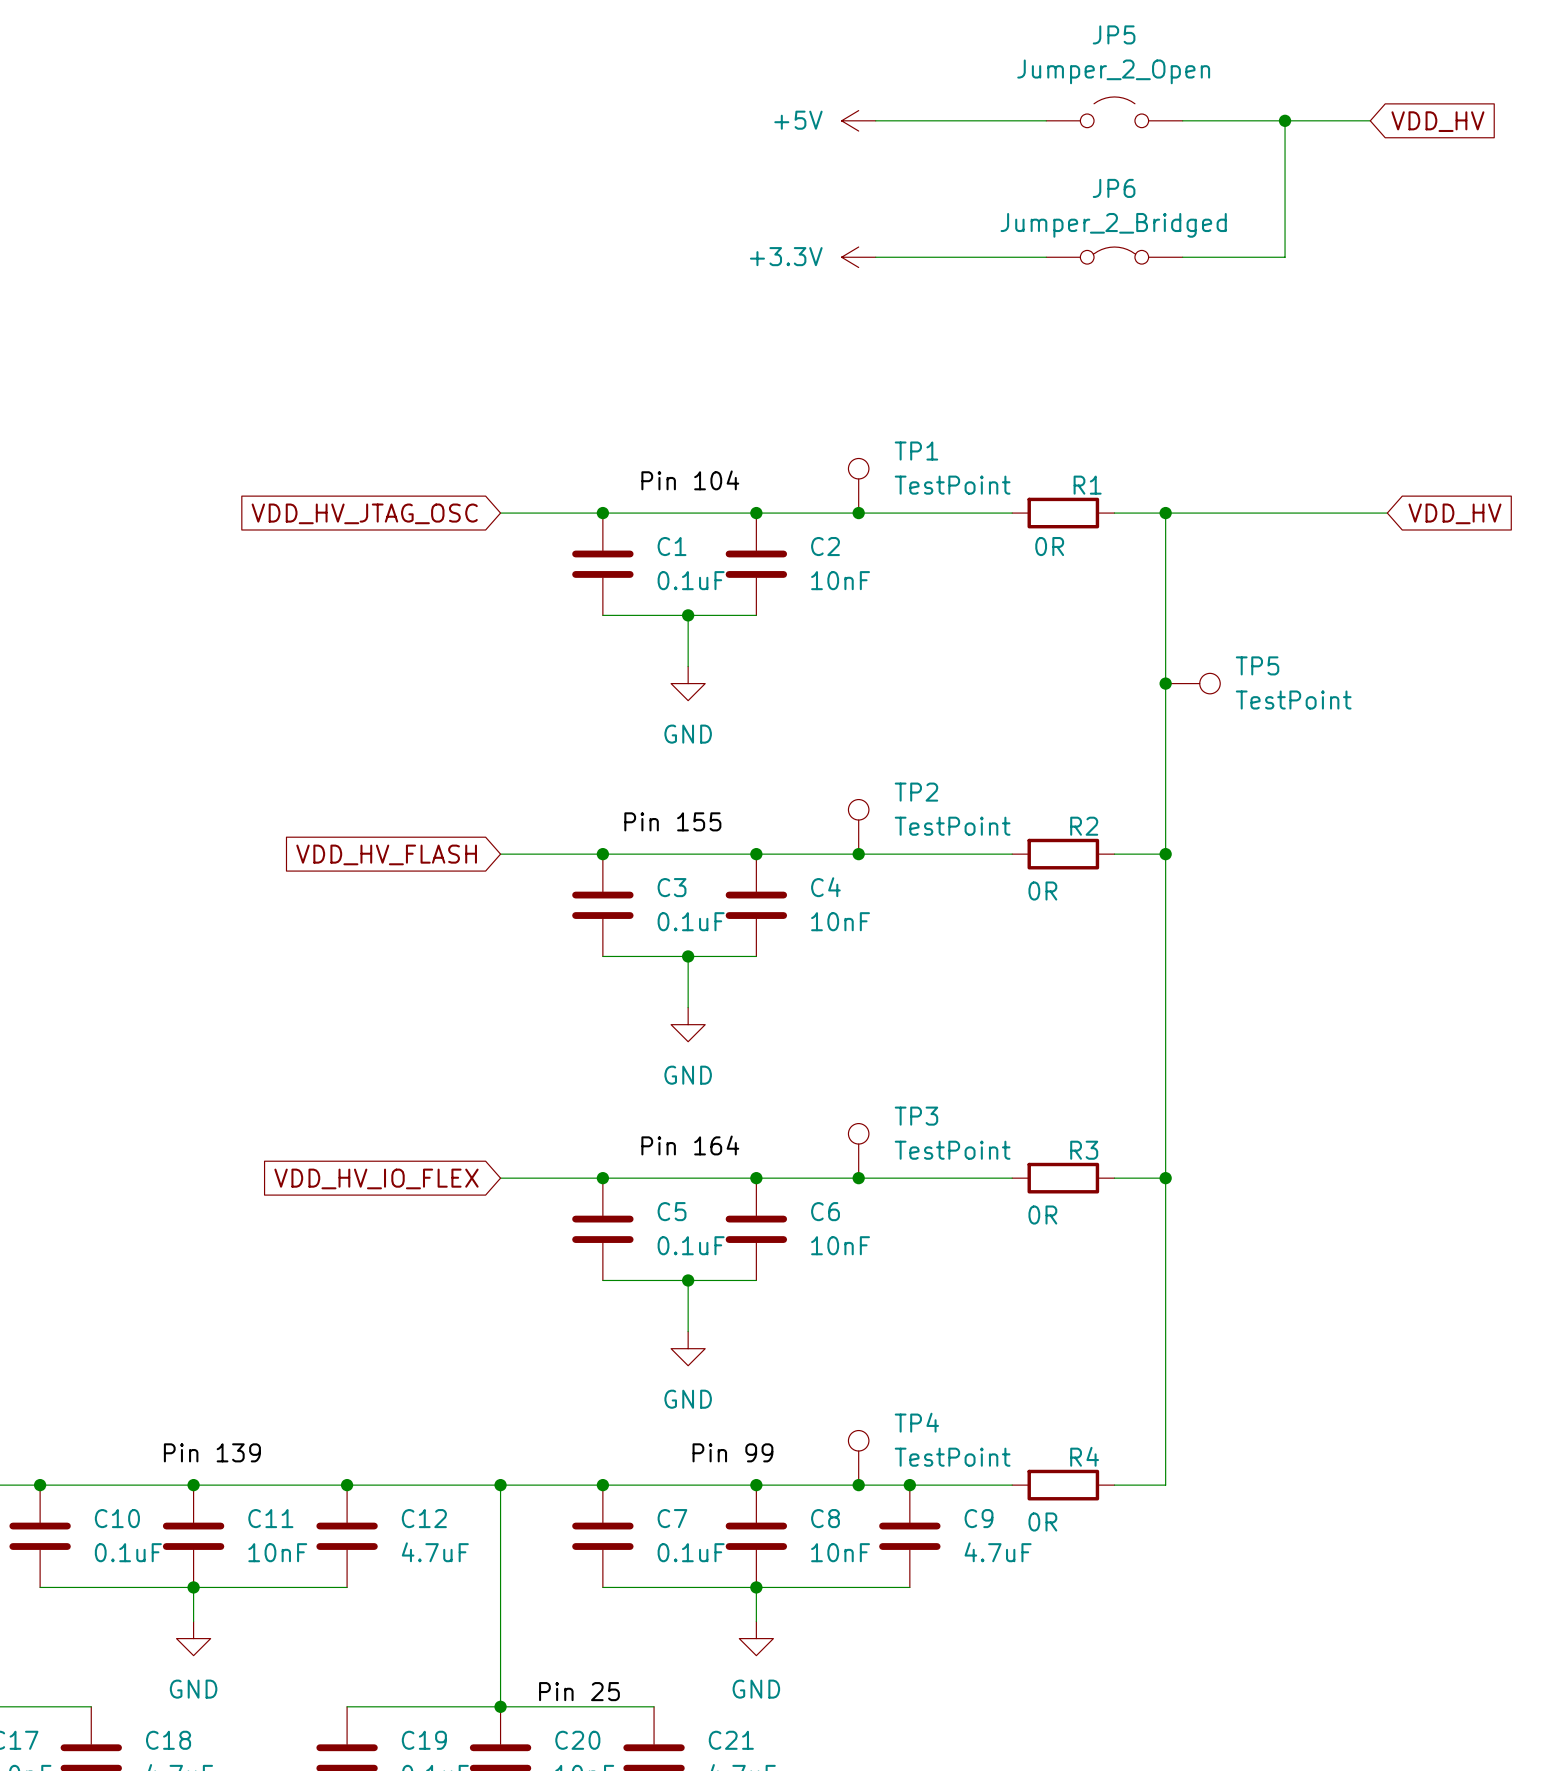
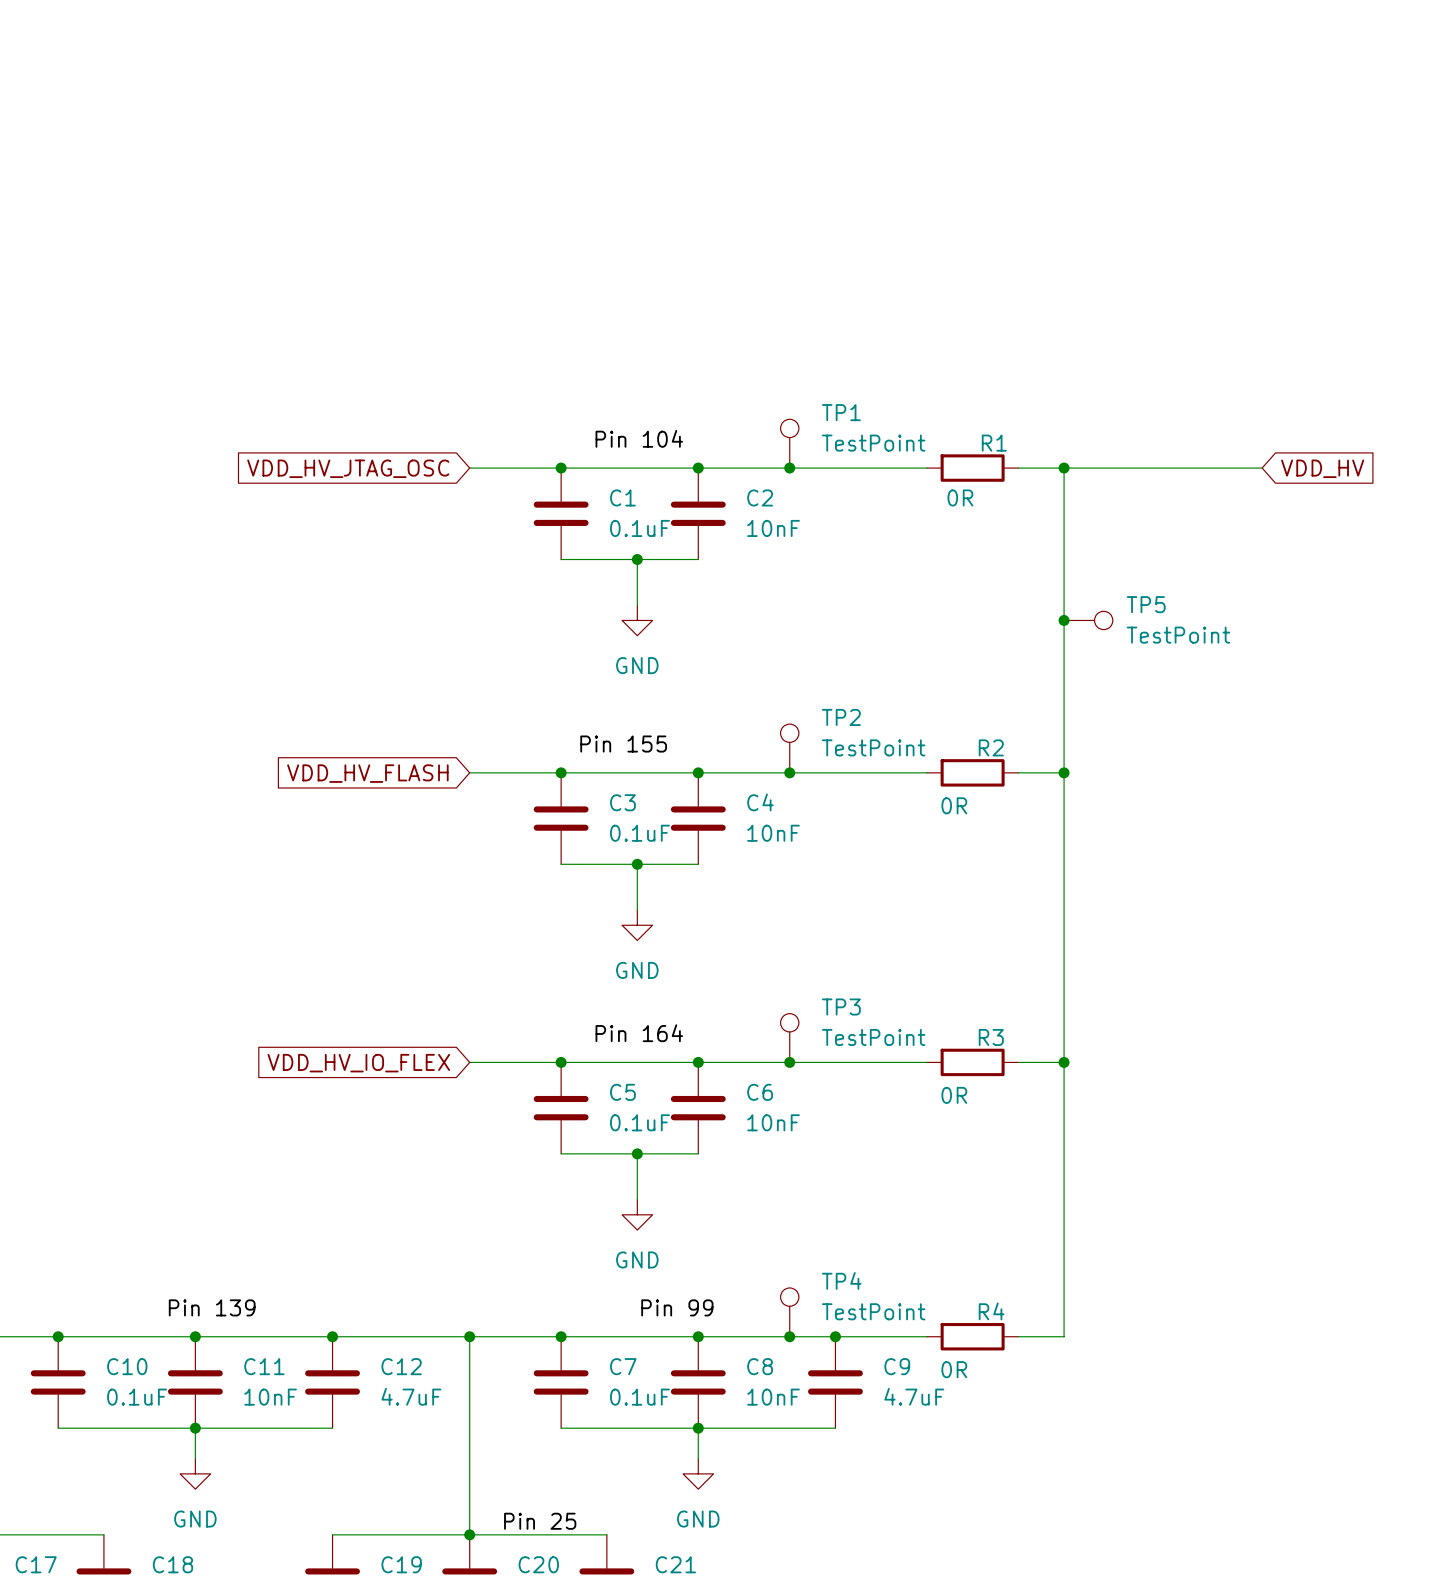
JP5: Jumper_2_Open (1114, 112) -> none
power symbol: +5V (858, 120) -> none
wire: (875, 120) (1046, 120) -> none
wire: (1182, 120) (1370, 120) -> none
wire: (1285, 120) (1285, 257) (1182, 257) -> none
junction: (1285, 120) -> none
global label: VDD_HV (1437, 121) -> none
JP6: Jumper_2_Bridged (1114, 255) -> none
power symbol: +3.3V (858, 257) -> none
wire: (875, 257) (1046, 257) -> none

